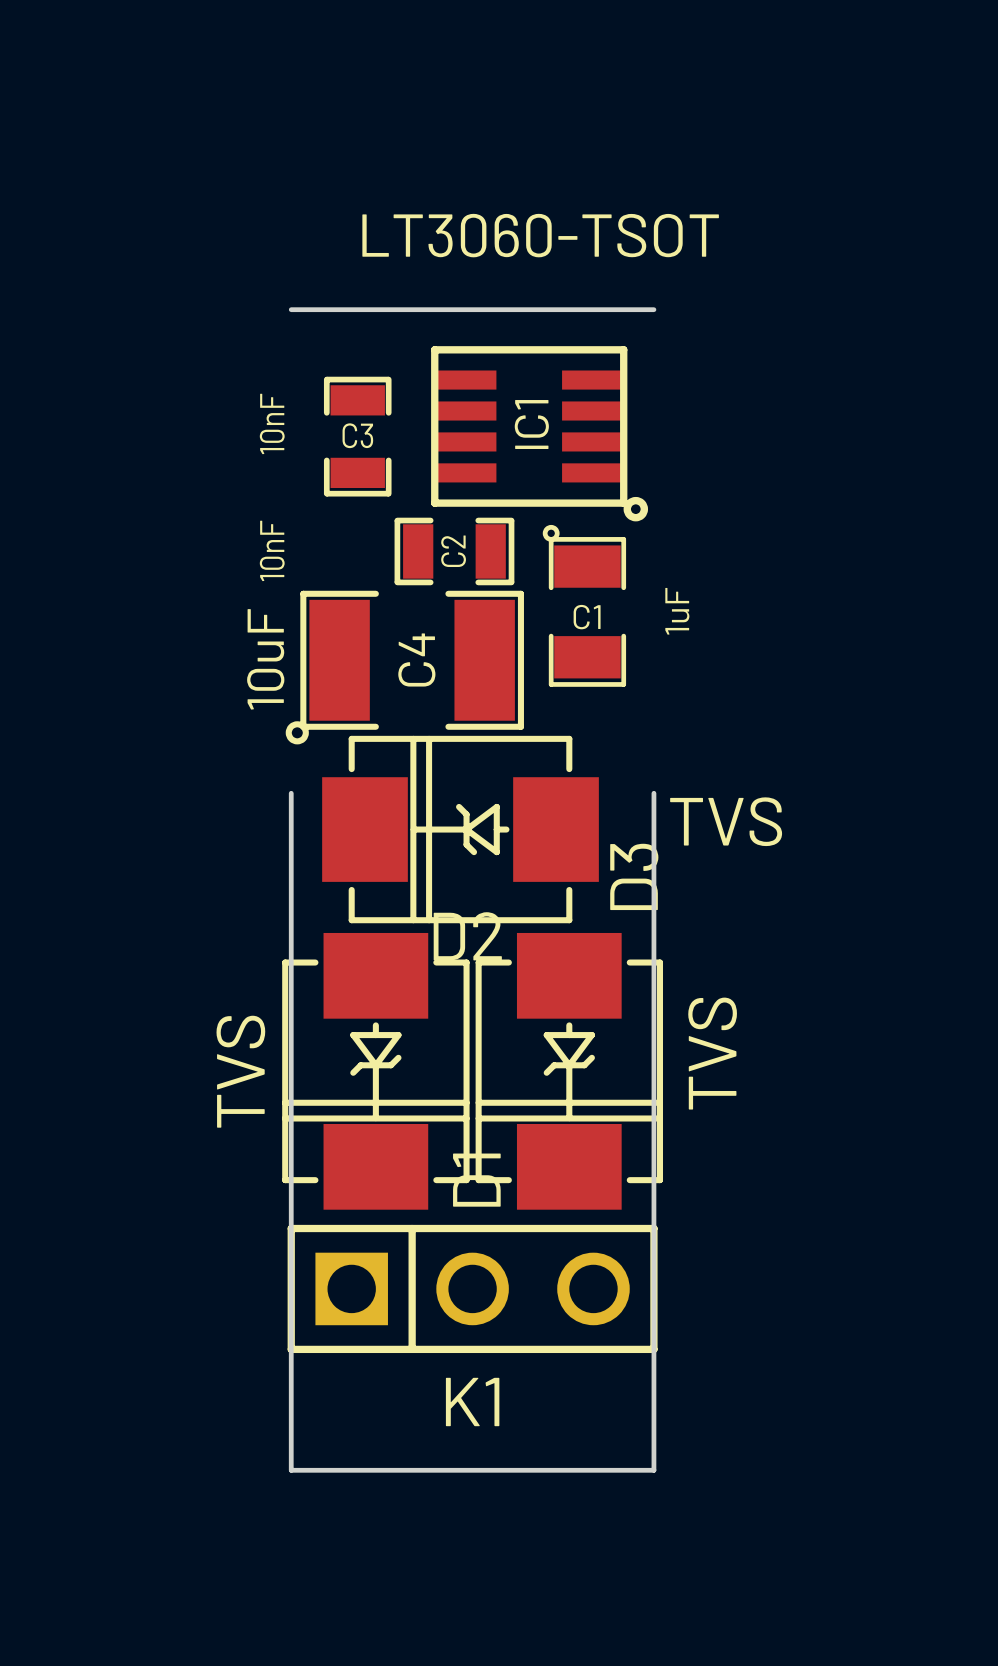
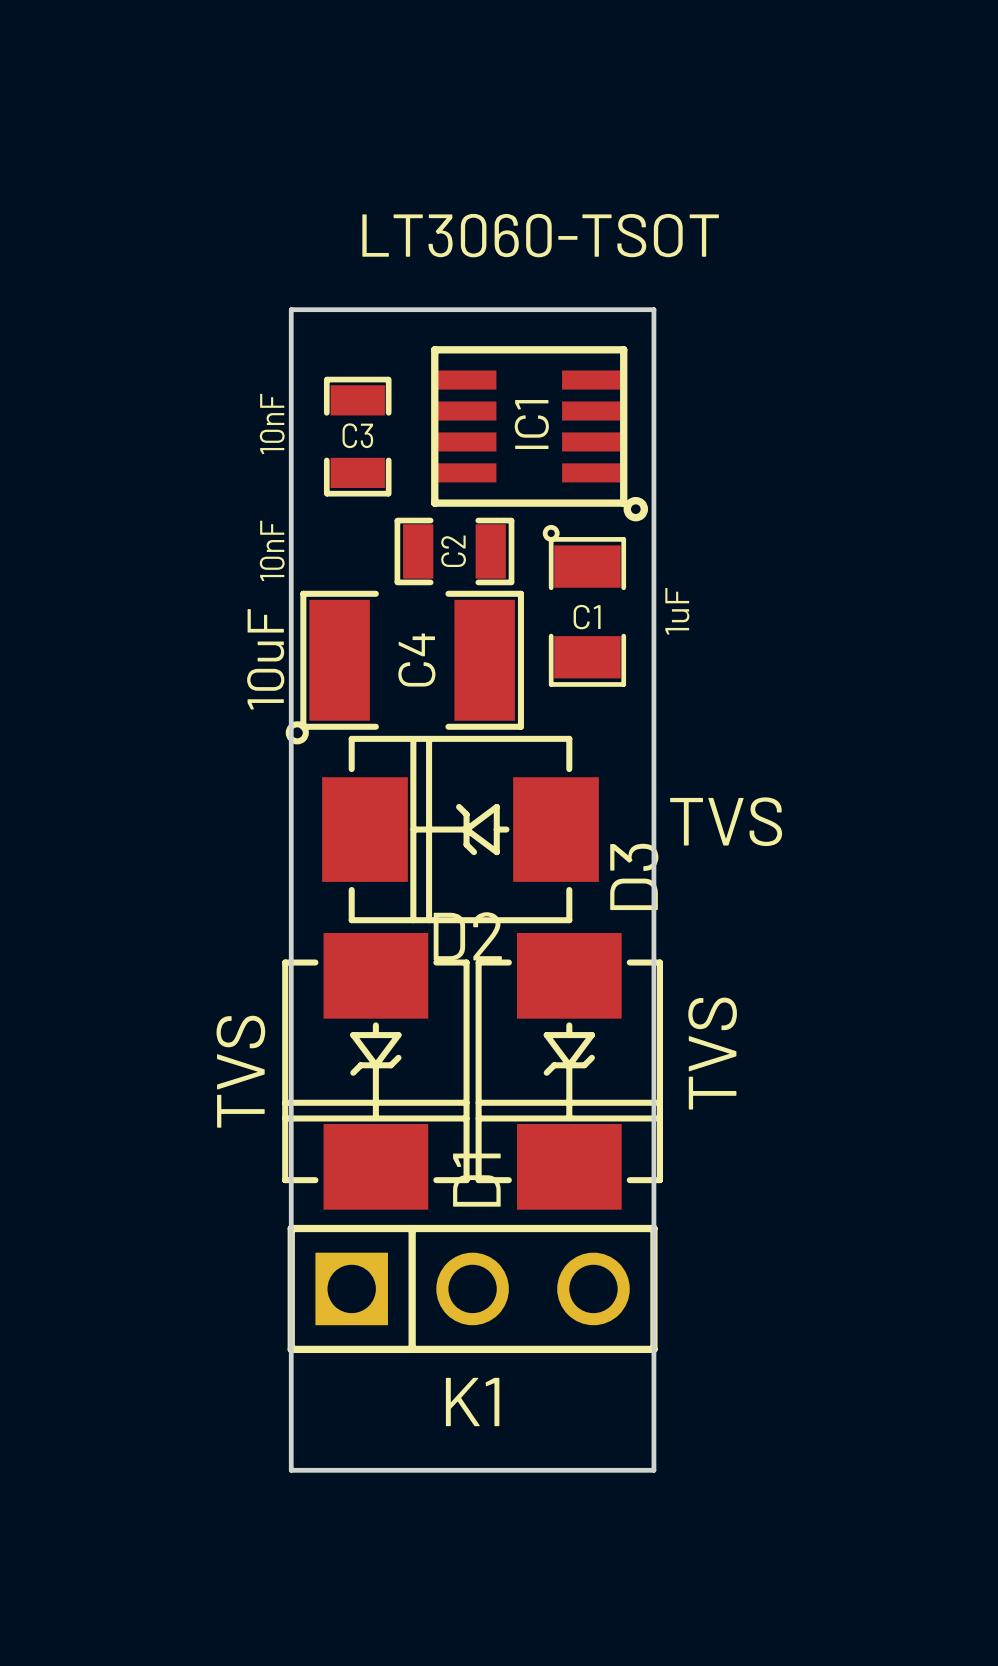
board edge: none -> (291, 309) (291, 793)
board edge: none -> (653, 309) (653, 793)

